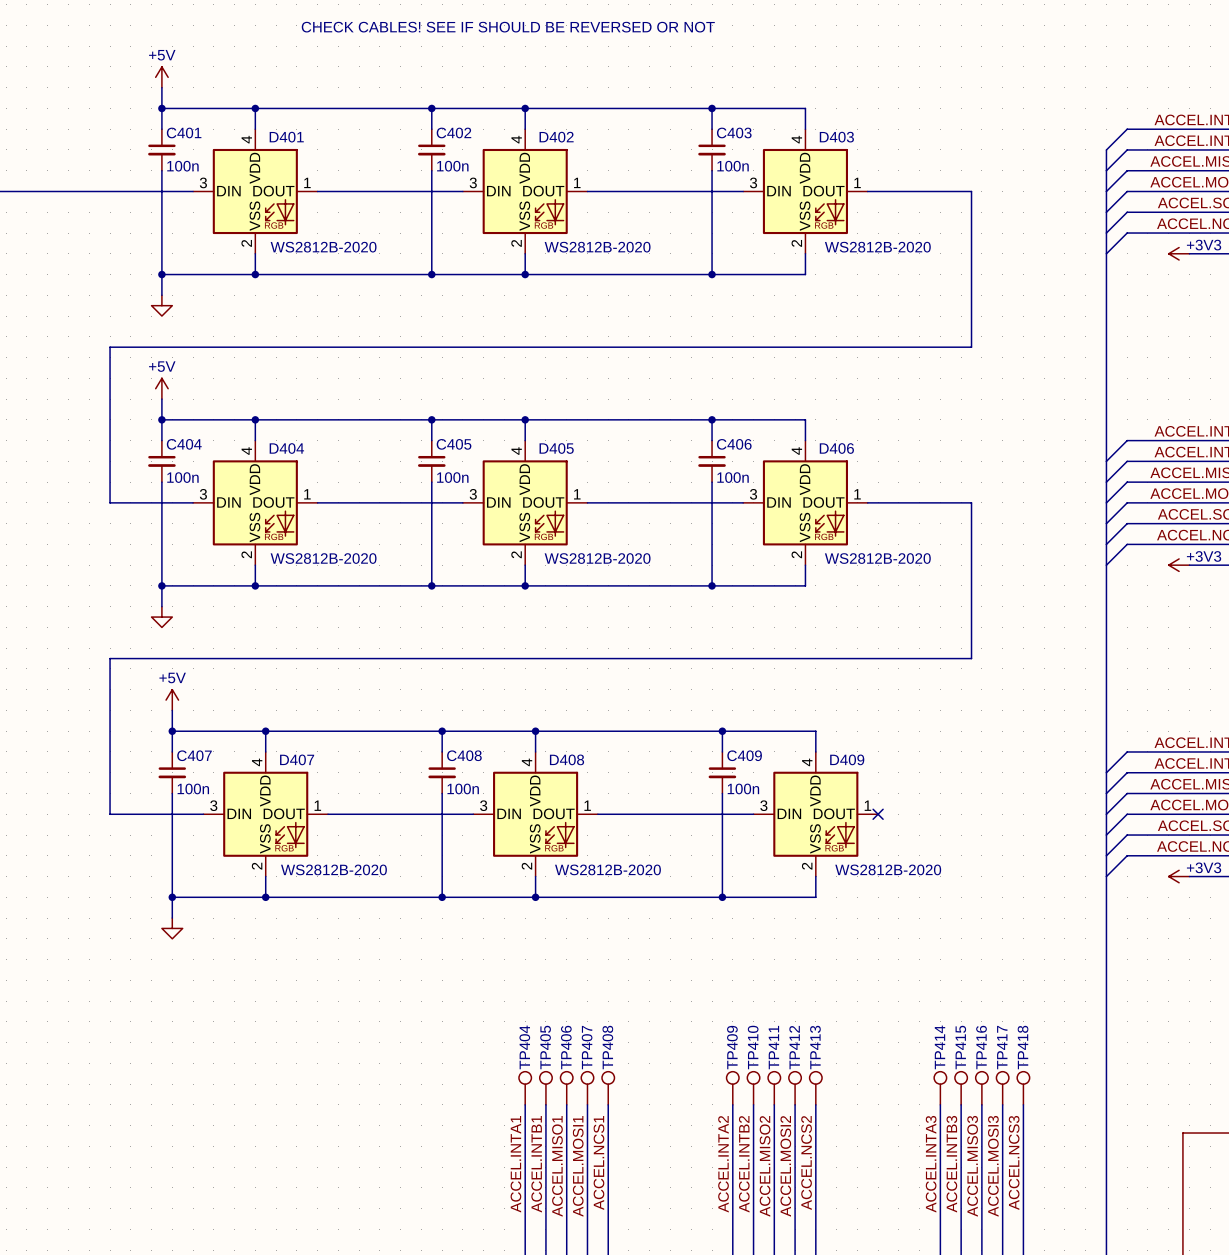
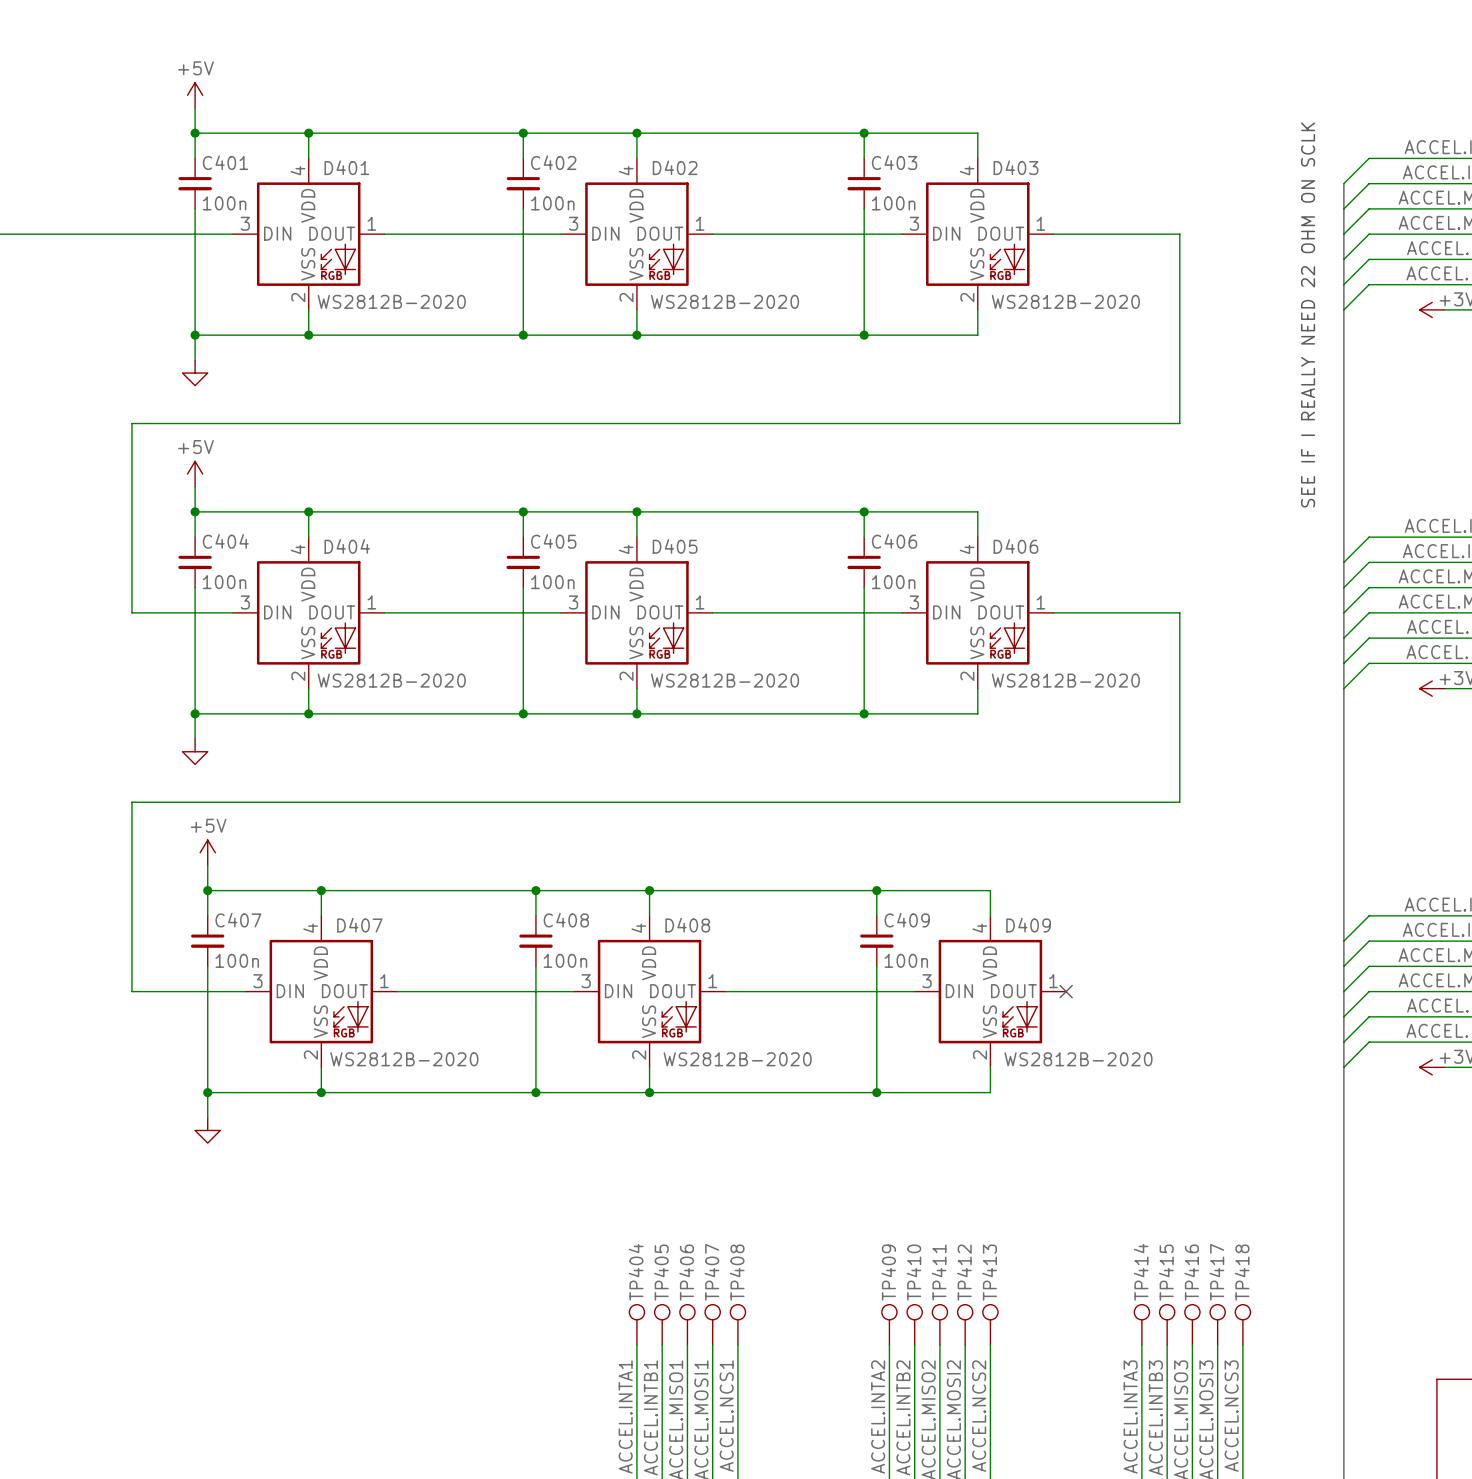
text: CHECK CABLES! SEE IF SHOULD BE REVERSED OR NOT (508, 27) -> none
text: none -> SEE IF I REALLY NEED 22 OHM ON SCLK (1308, 314)

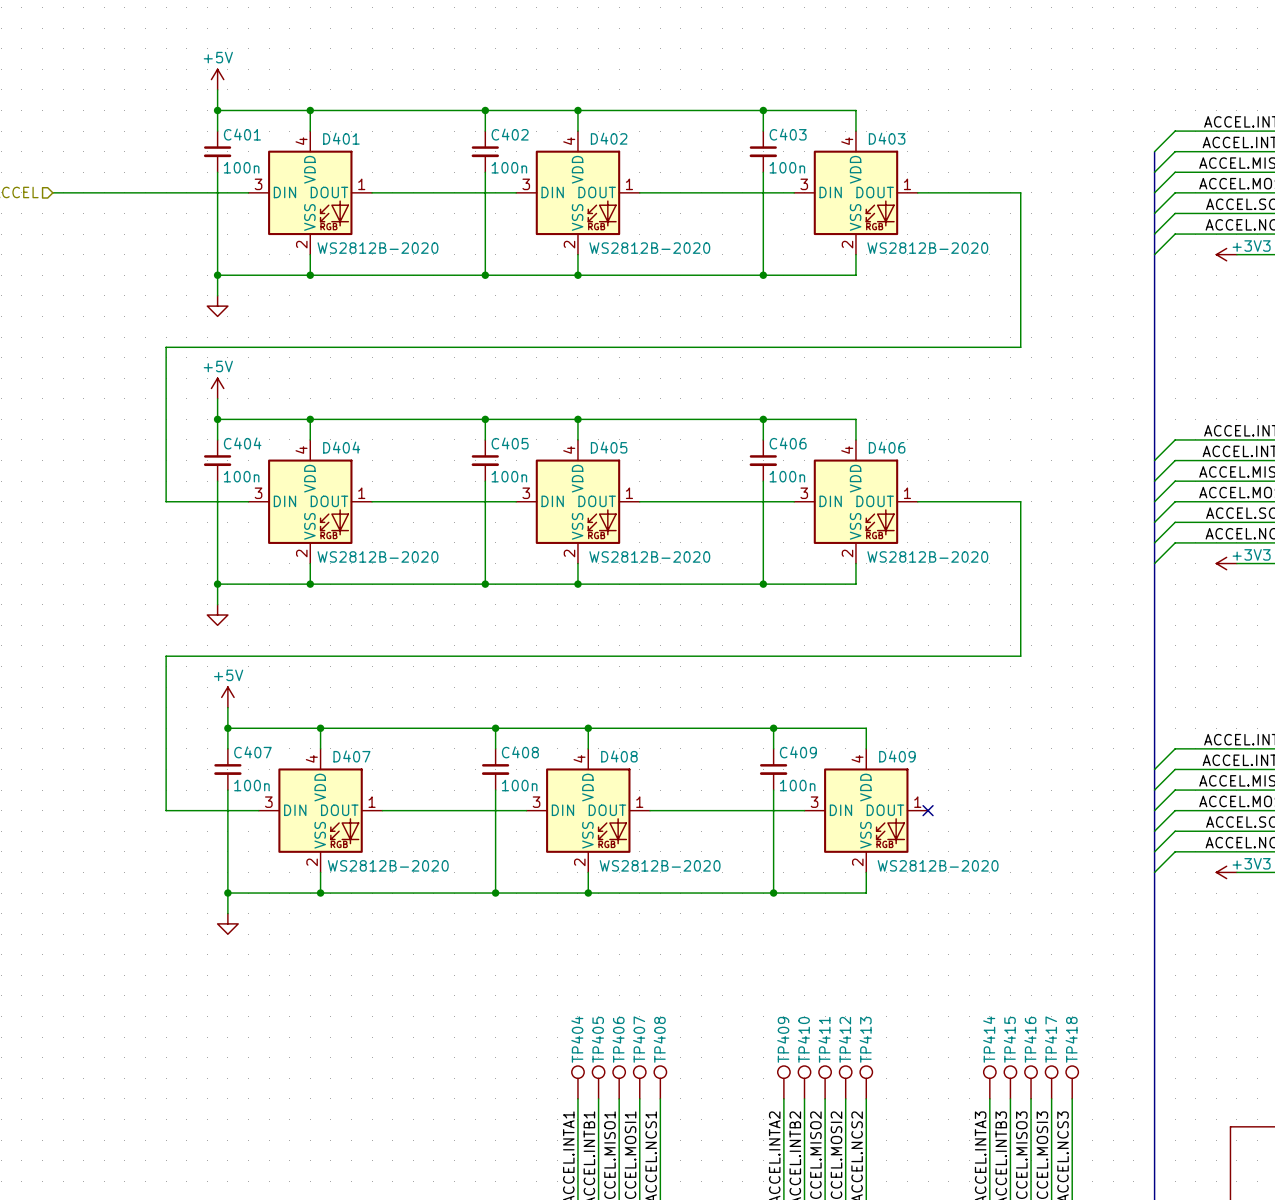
text: SEE IF I REALLY NEED 22 OHM ON SCLK (1308, 314) -> none

